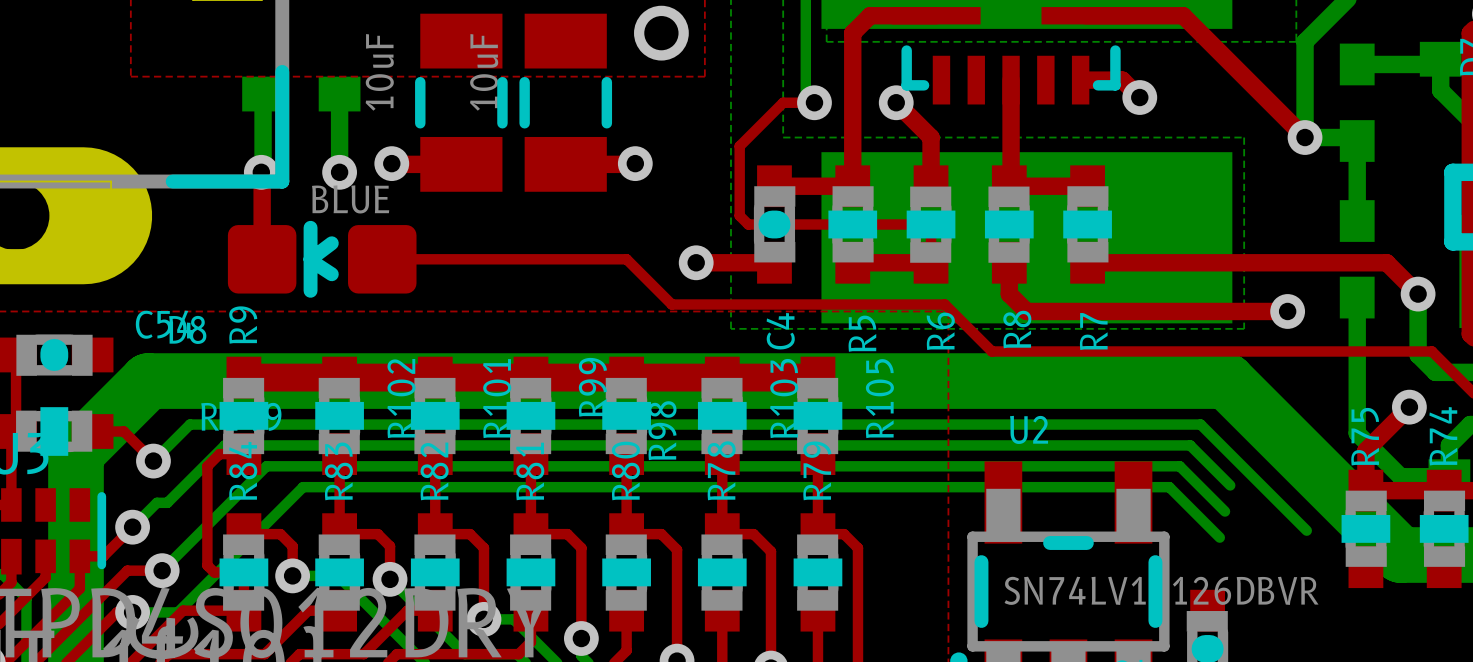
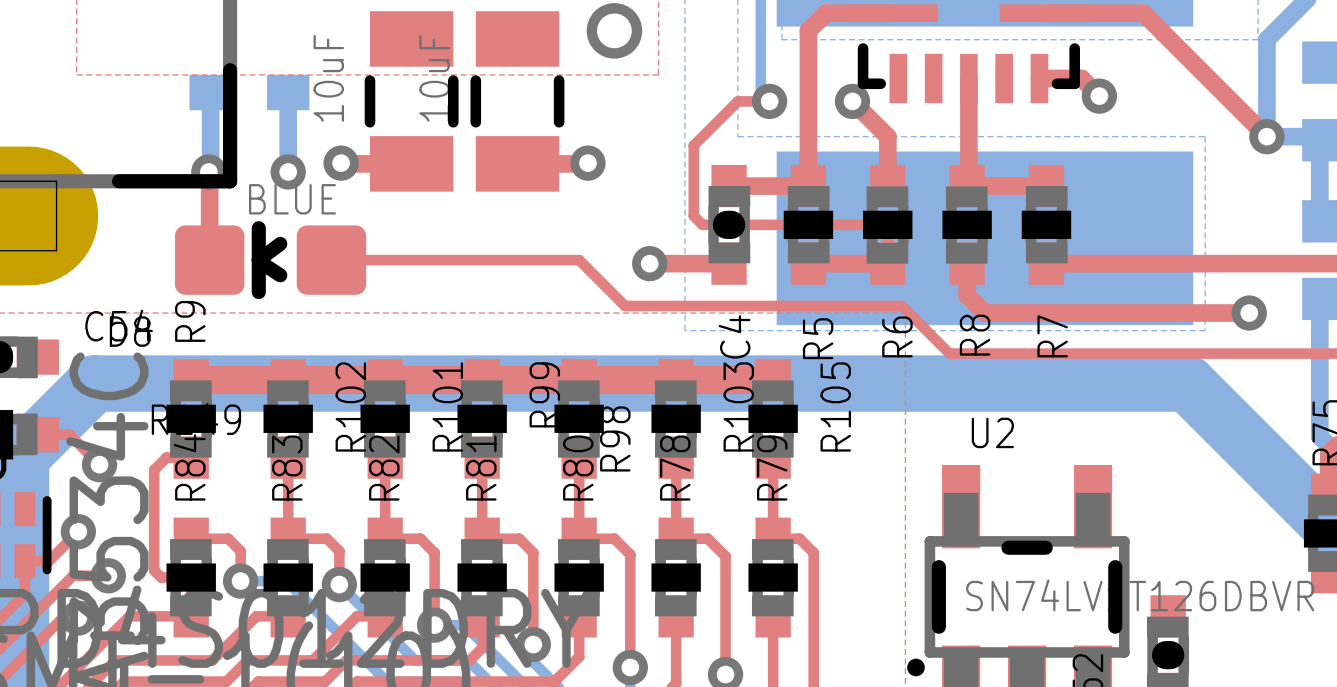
bottom track: (153, 461) (190, 424) (1200, 424) (1306, 530) -> none
bottom track: (1230, 485) (1190, 445) (224, 445) (167, 502) (156, 502) (132, 527) -> none
bottom track: (1225, 511) (1179, 466) (266, 466) (162, 570) -> none
bottom track: (1219, 537) (1169, 487) (303, 487) (177, 612) (132, 612) -> none

